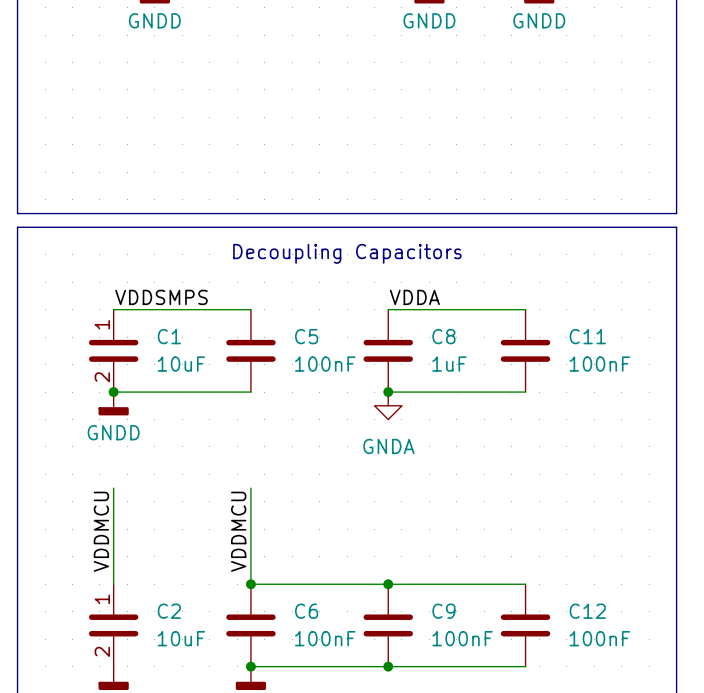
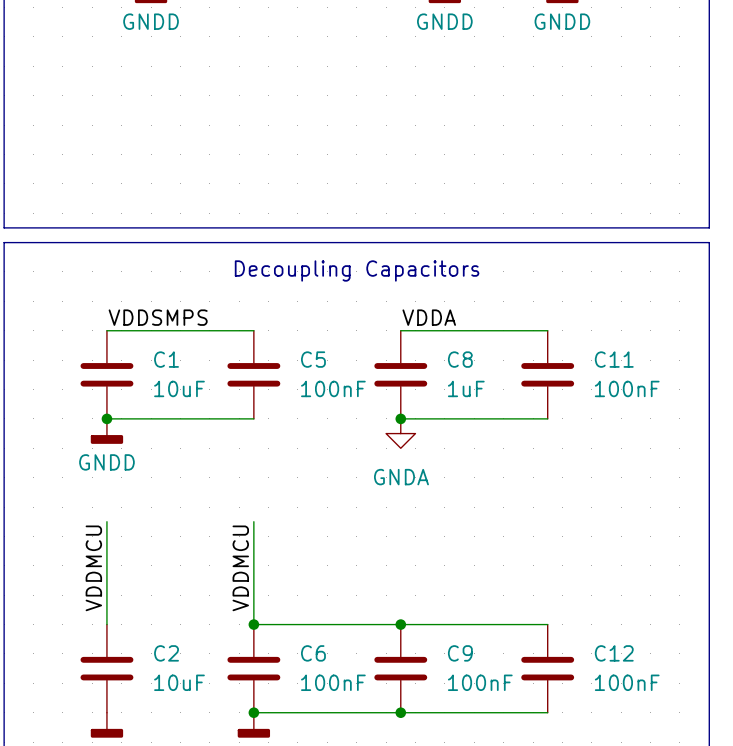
C1 pin number: 1 (102, 324) -> none
C1 pin number: 2 (102, 377) -> none
C2 pin number: 1 (102, 599) -> none
C2 pin number: 2 (102, 651) -> none

